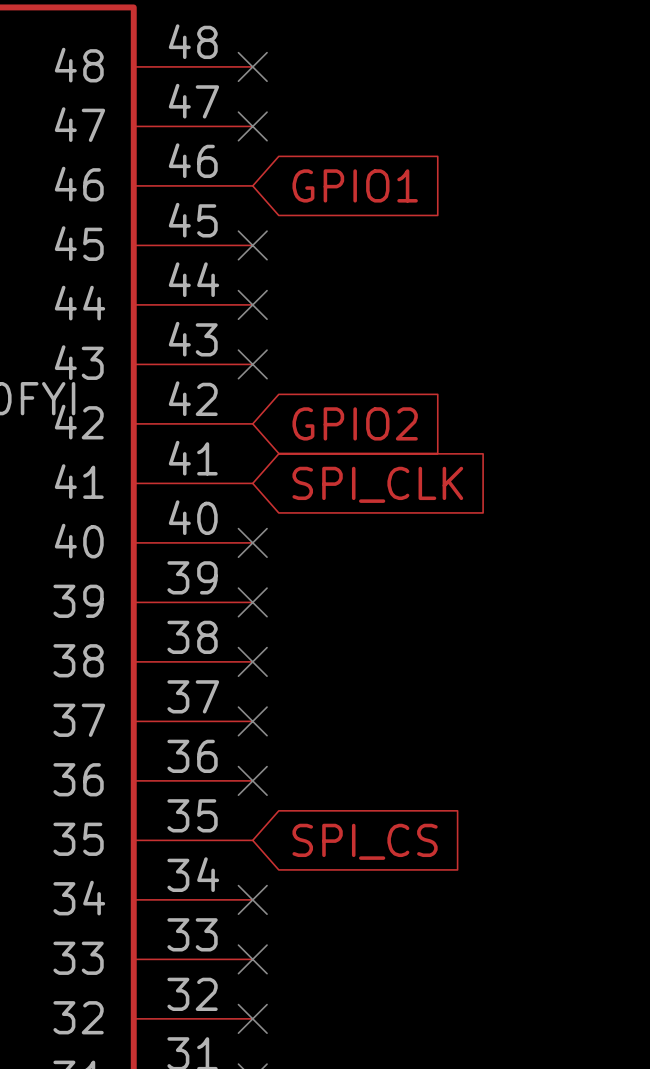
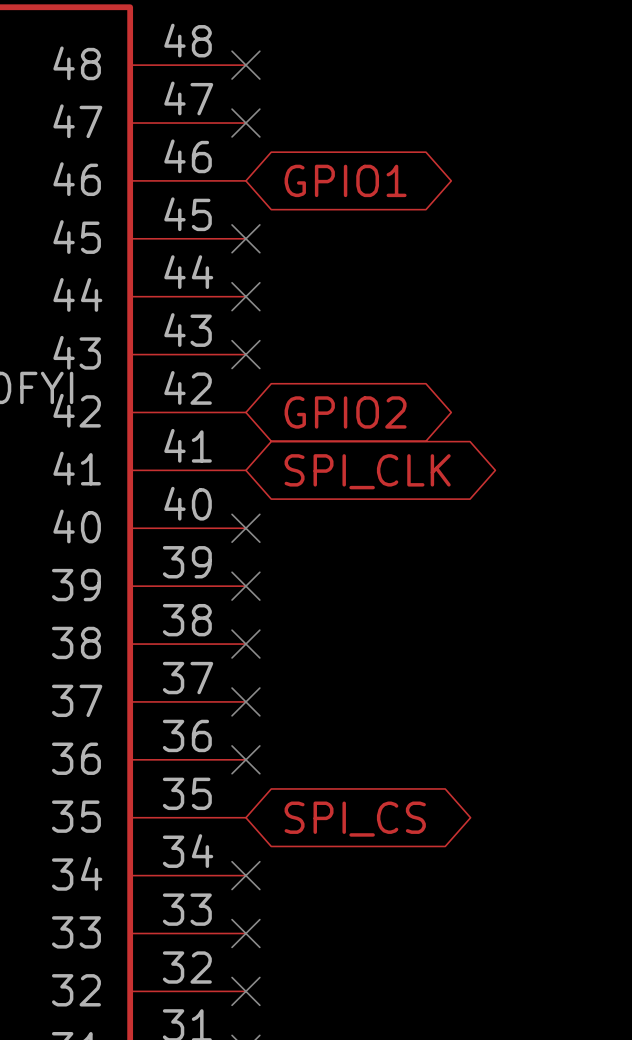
global label shape: input (355, 185) -> bidirectional (345, 180)
global label shape: input (355, 423) -> bidirectional (345, 412)
global label shape: input (377, 484) -> bidirectional (367, 471)
global label shape: input (365, 841) -> bidirectional (355, 819)

